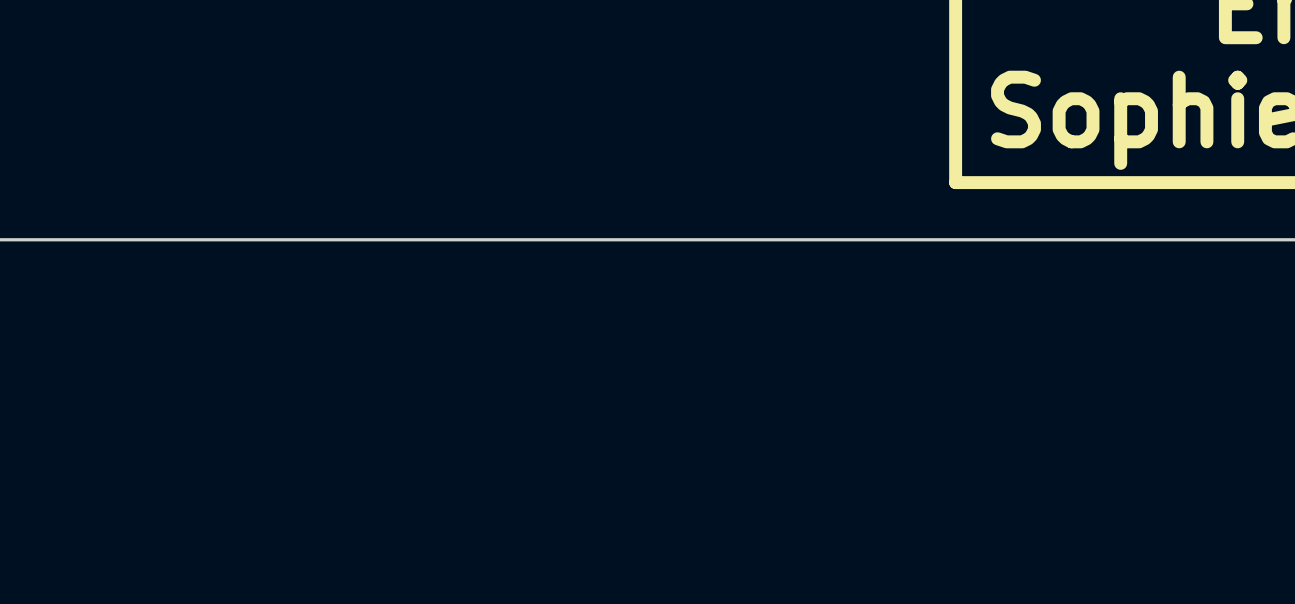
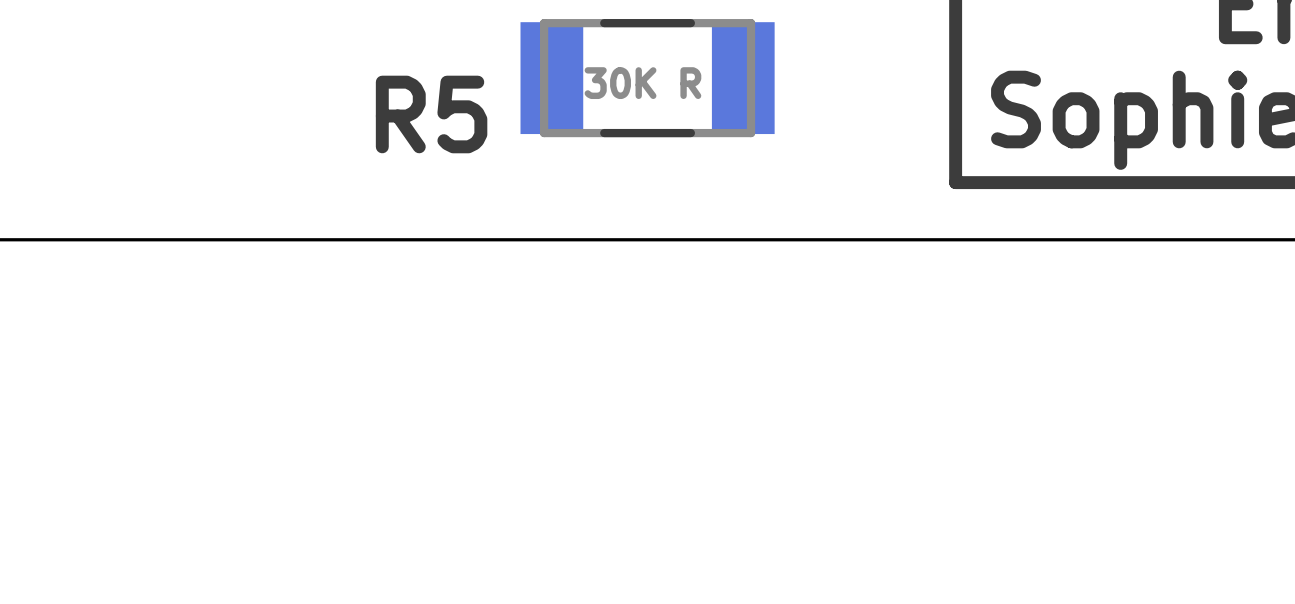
R5: none -> 30K R (647, 78)

